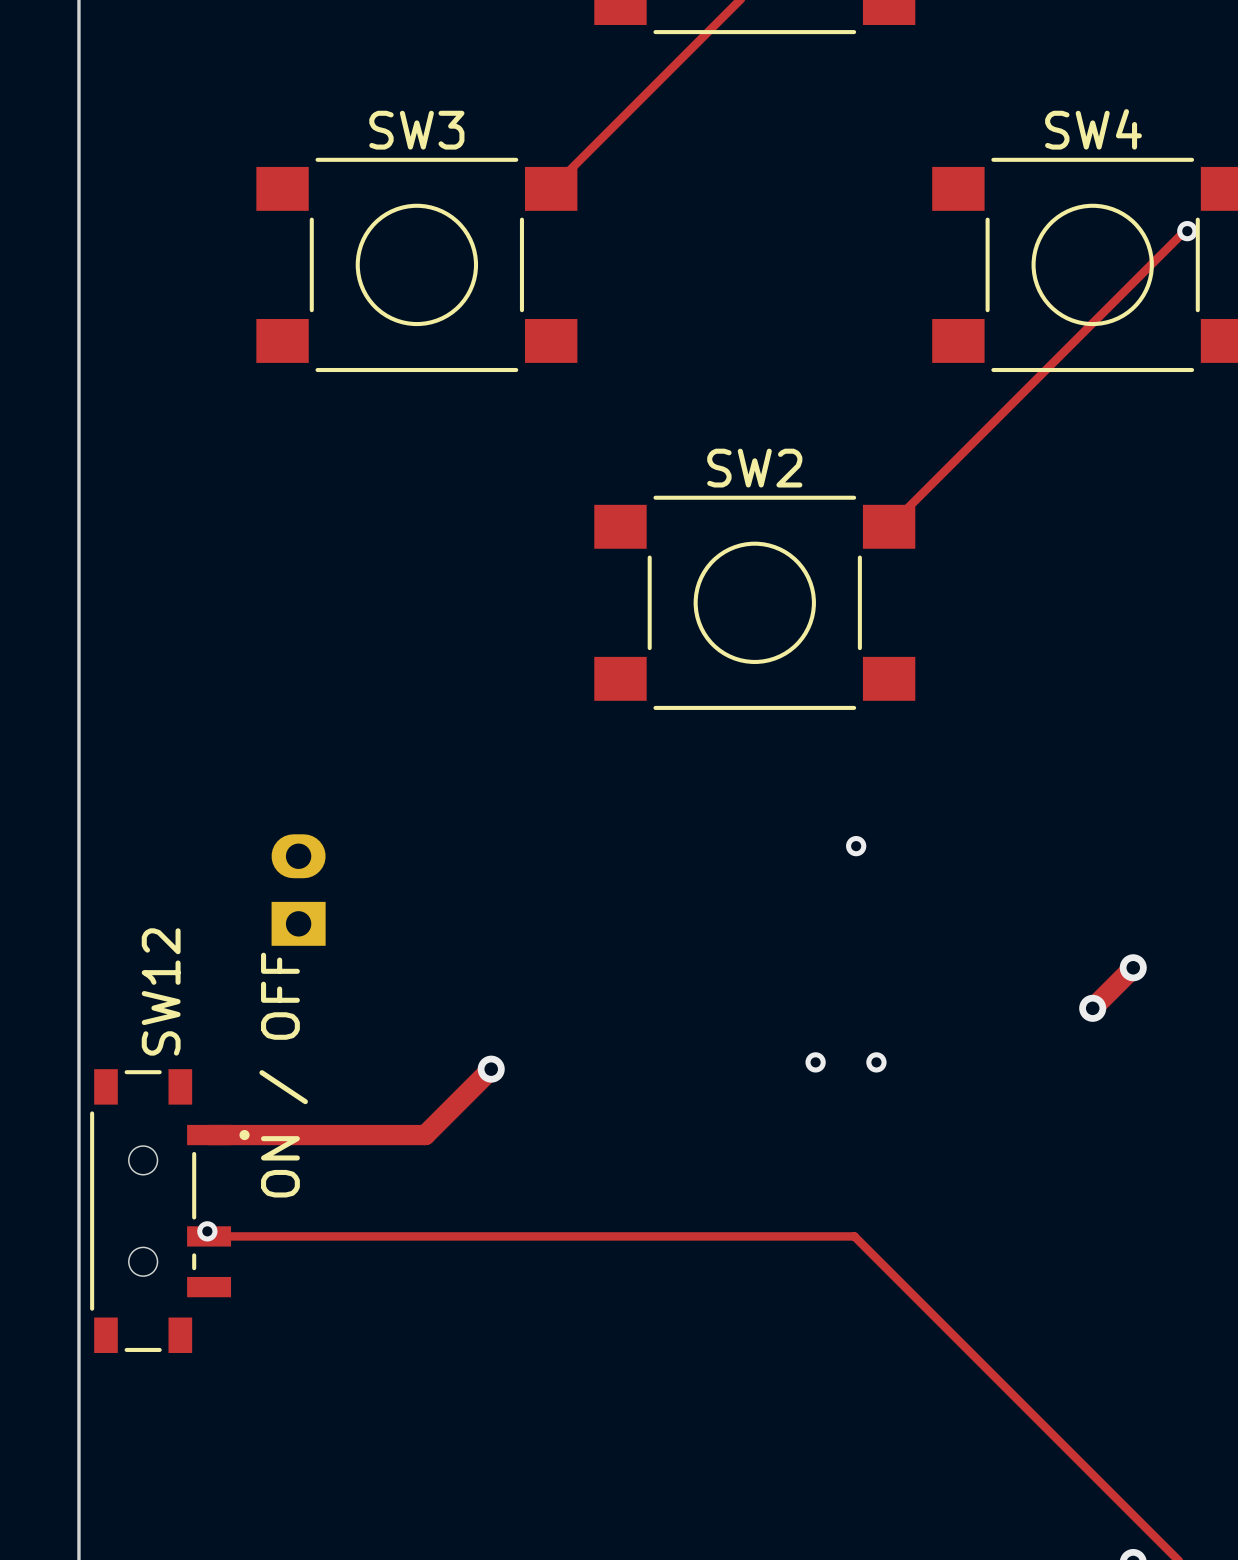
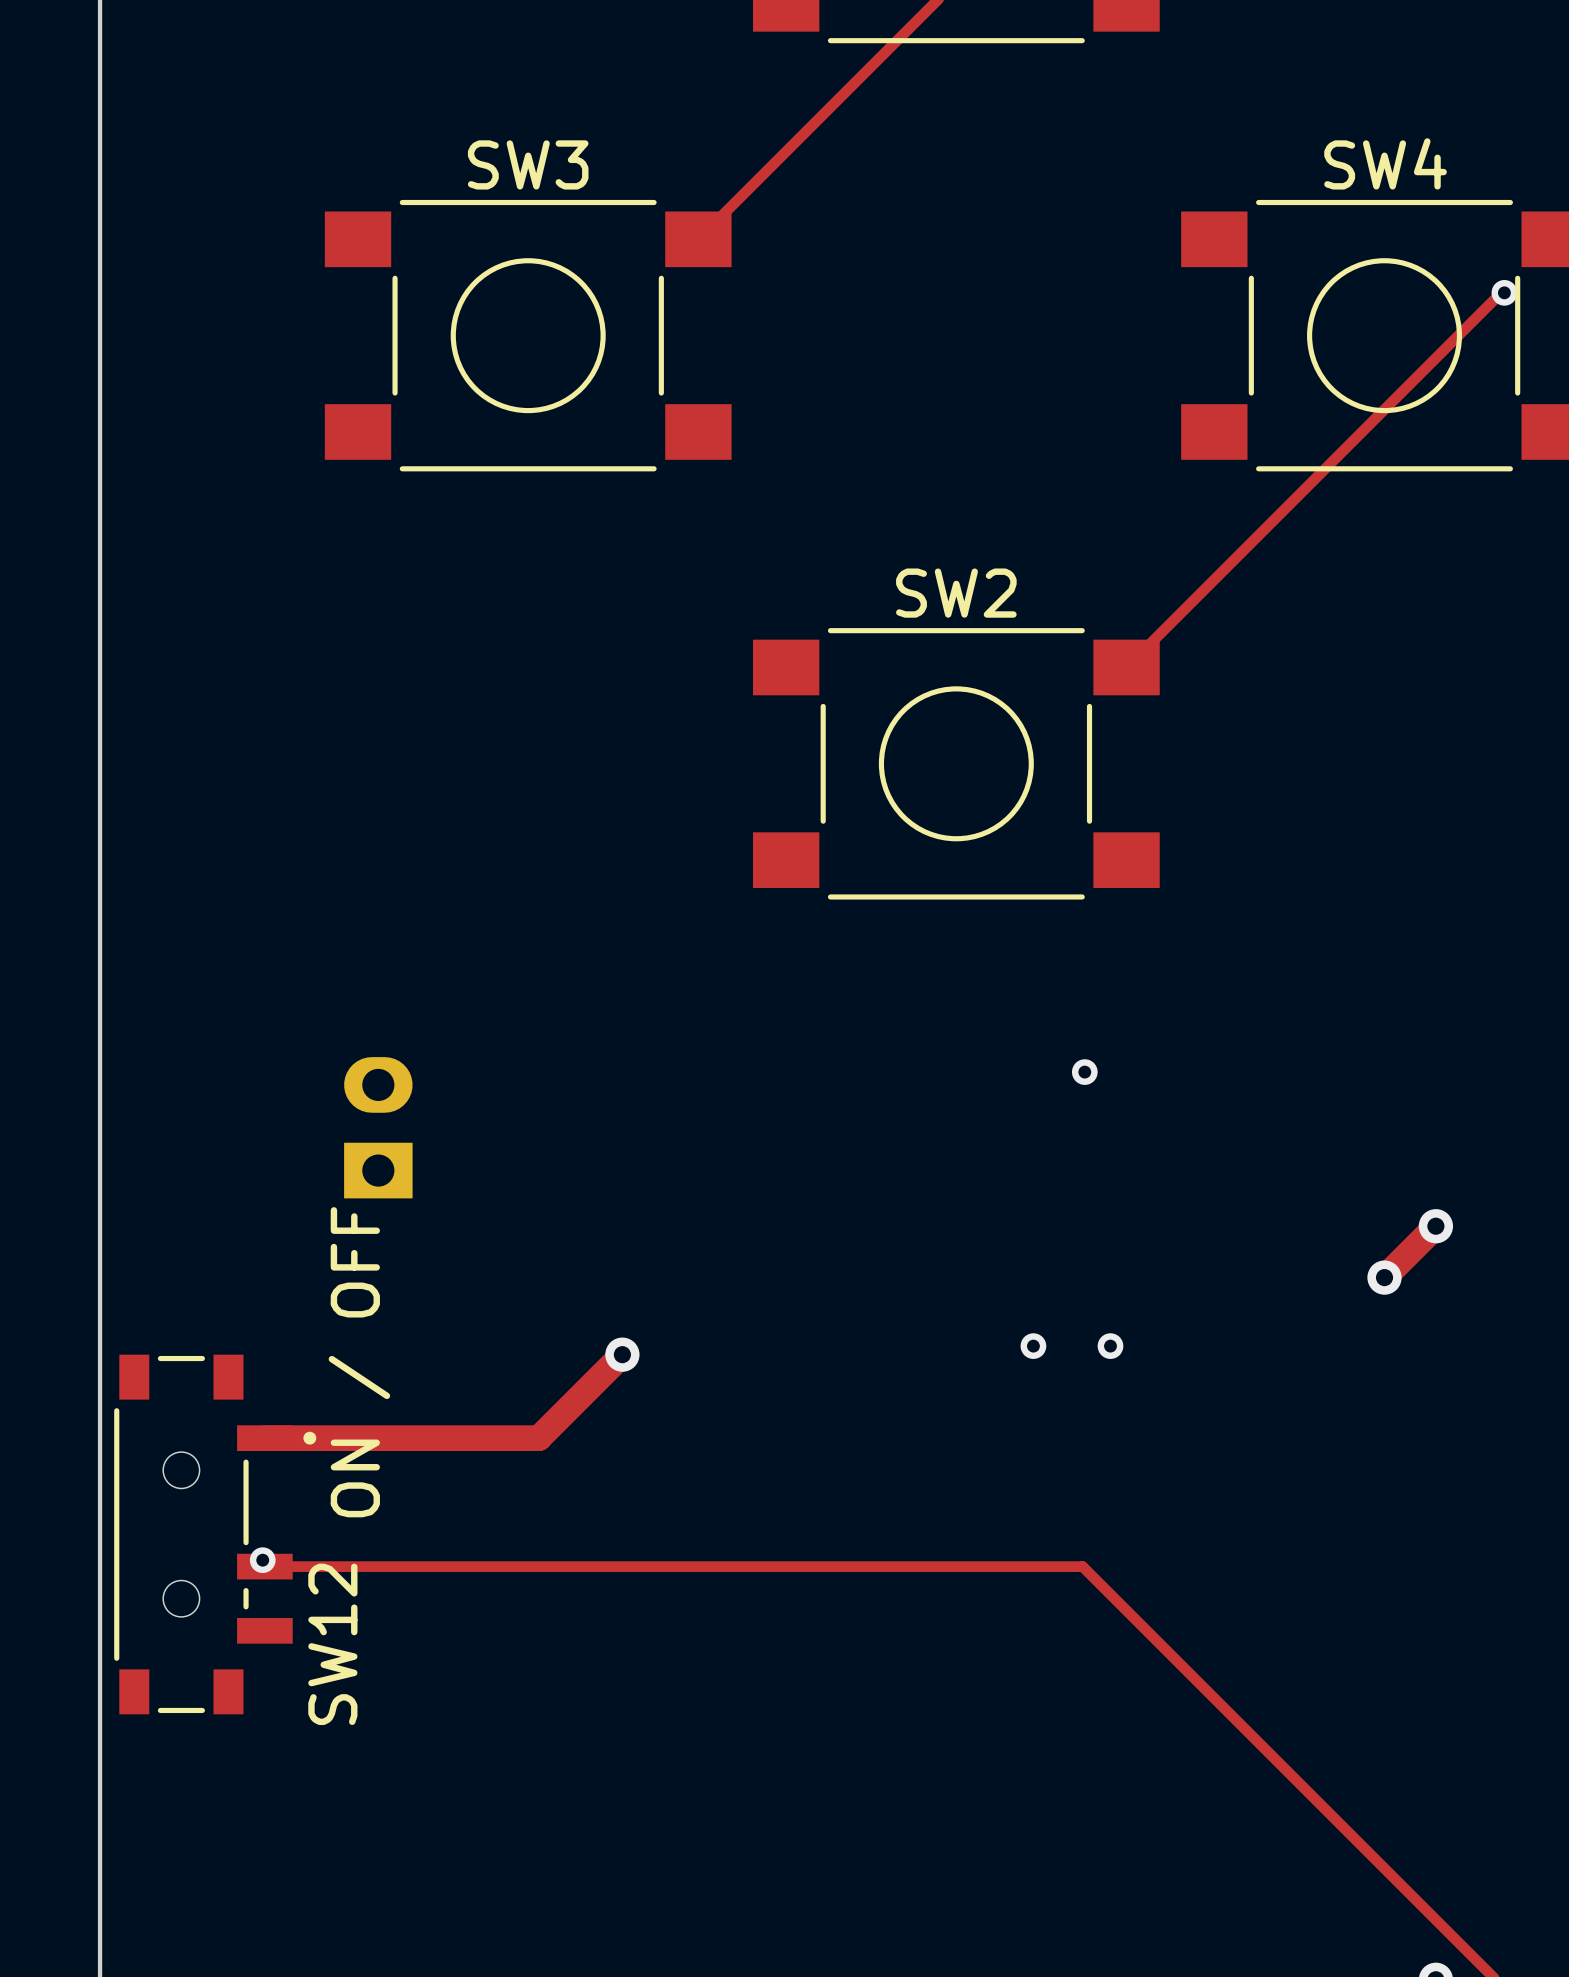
SW12 name position: SW12 (161, 991) -> SW12 (332, 1644)

